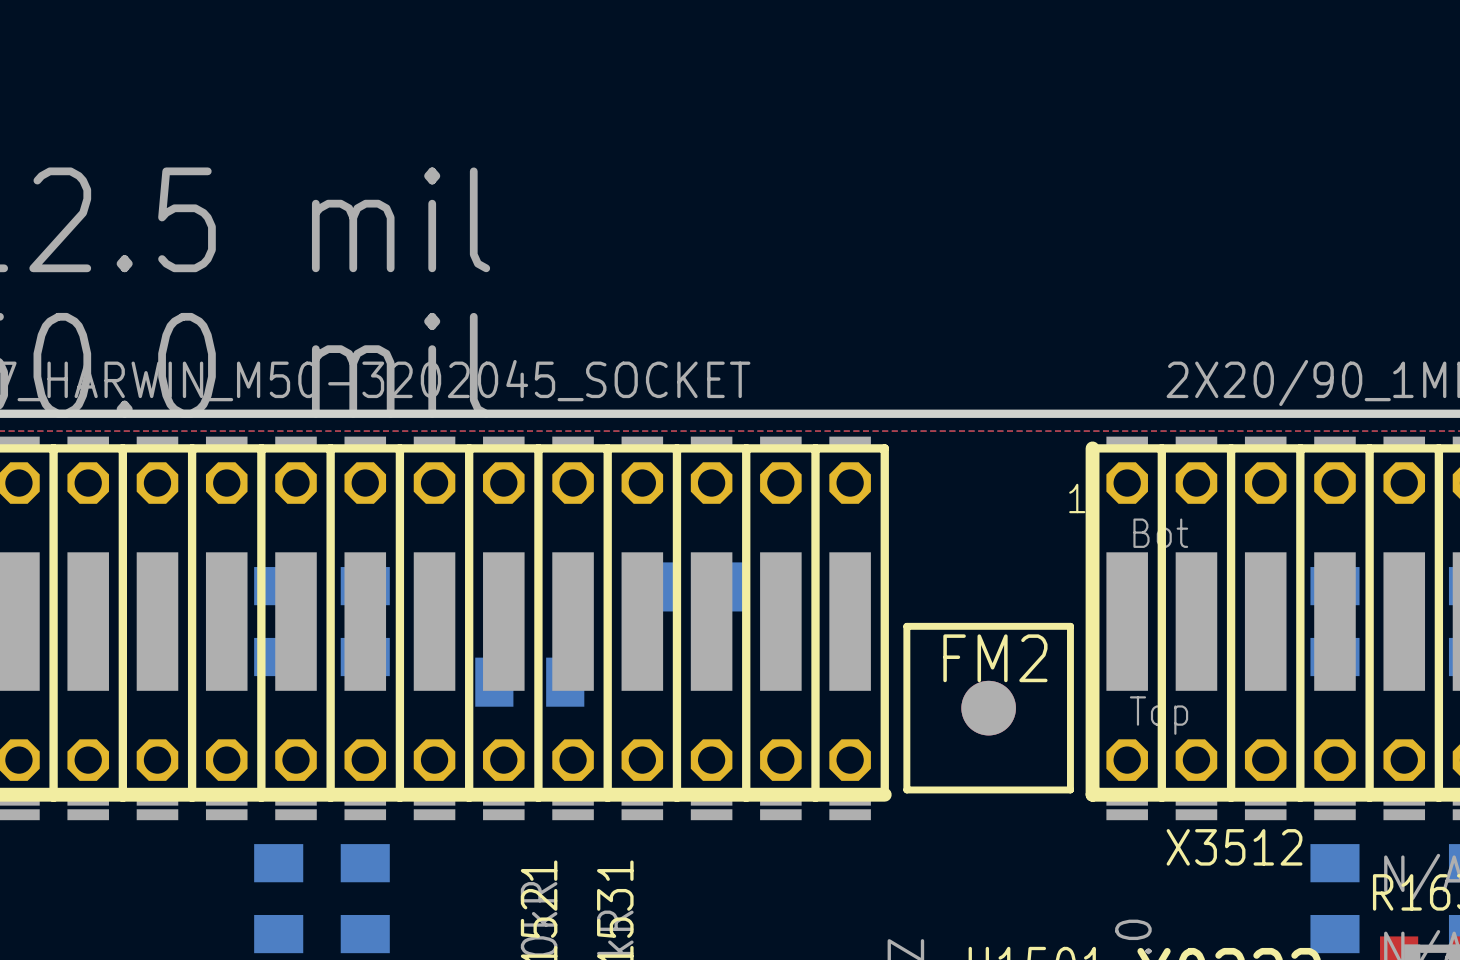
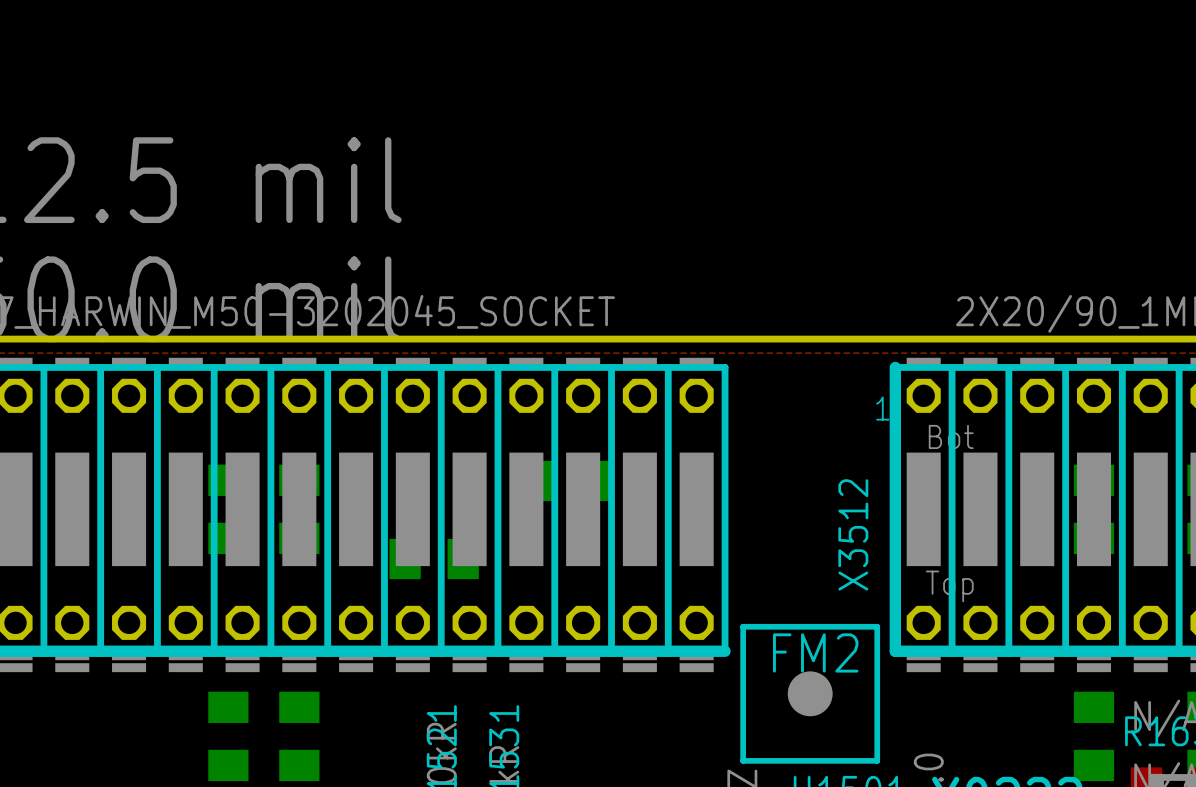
FM2 position: (988, 708) -> (810, 693)
X3512 name rotation: 0° (1234, 847) -> 90° counterclockwise (853, 534)
X3512 name position: X3512 (1234, 847) -> X3512 (853, 534)

